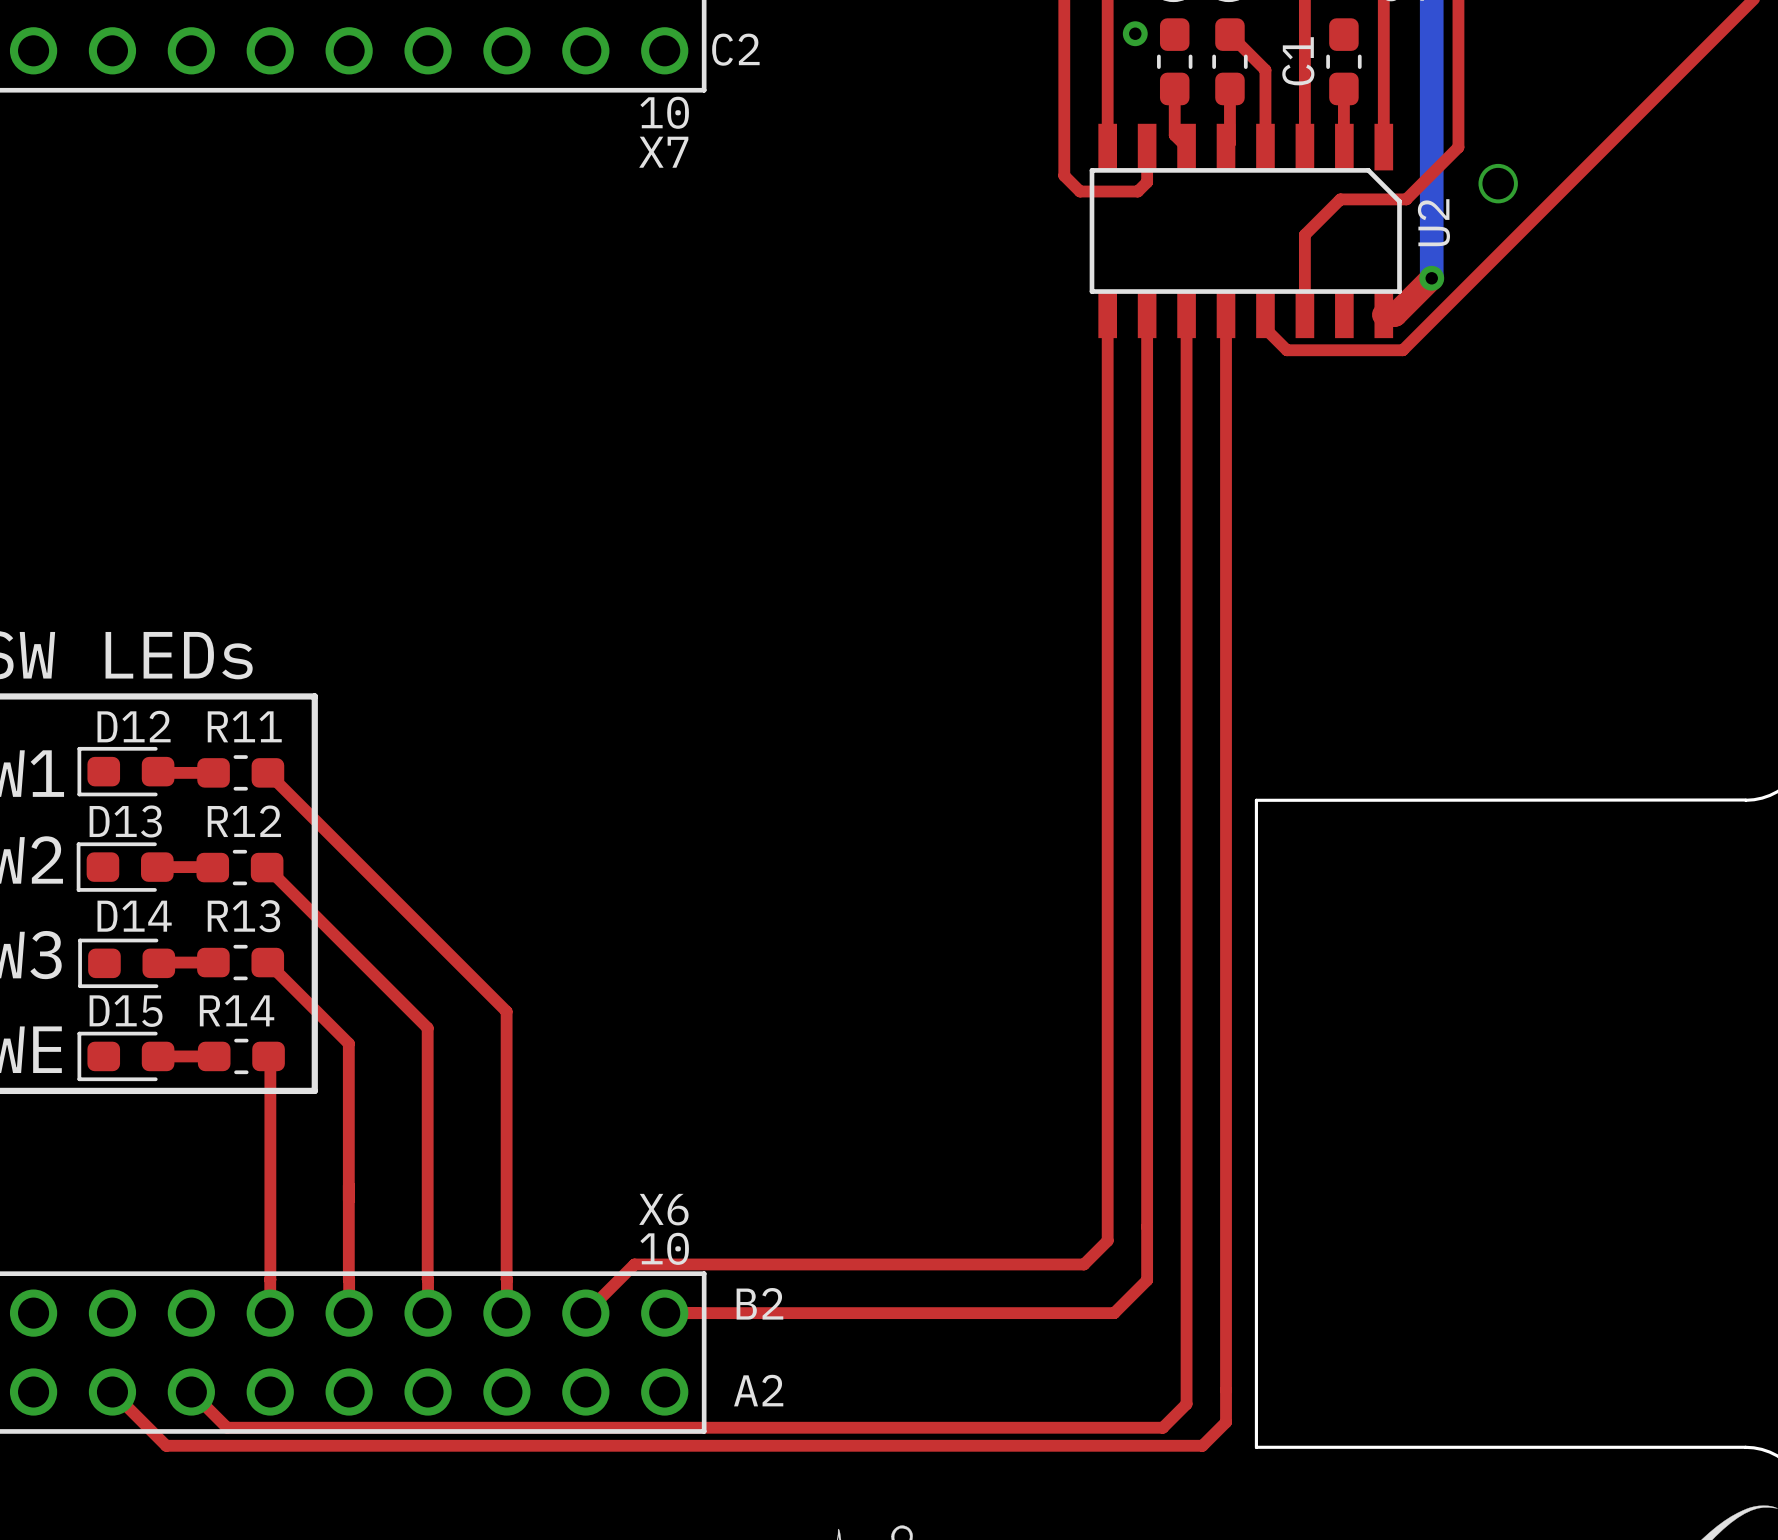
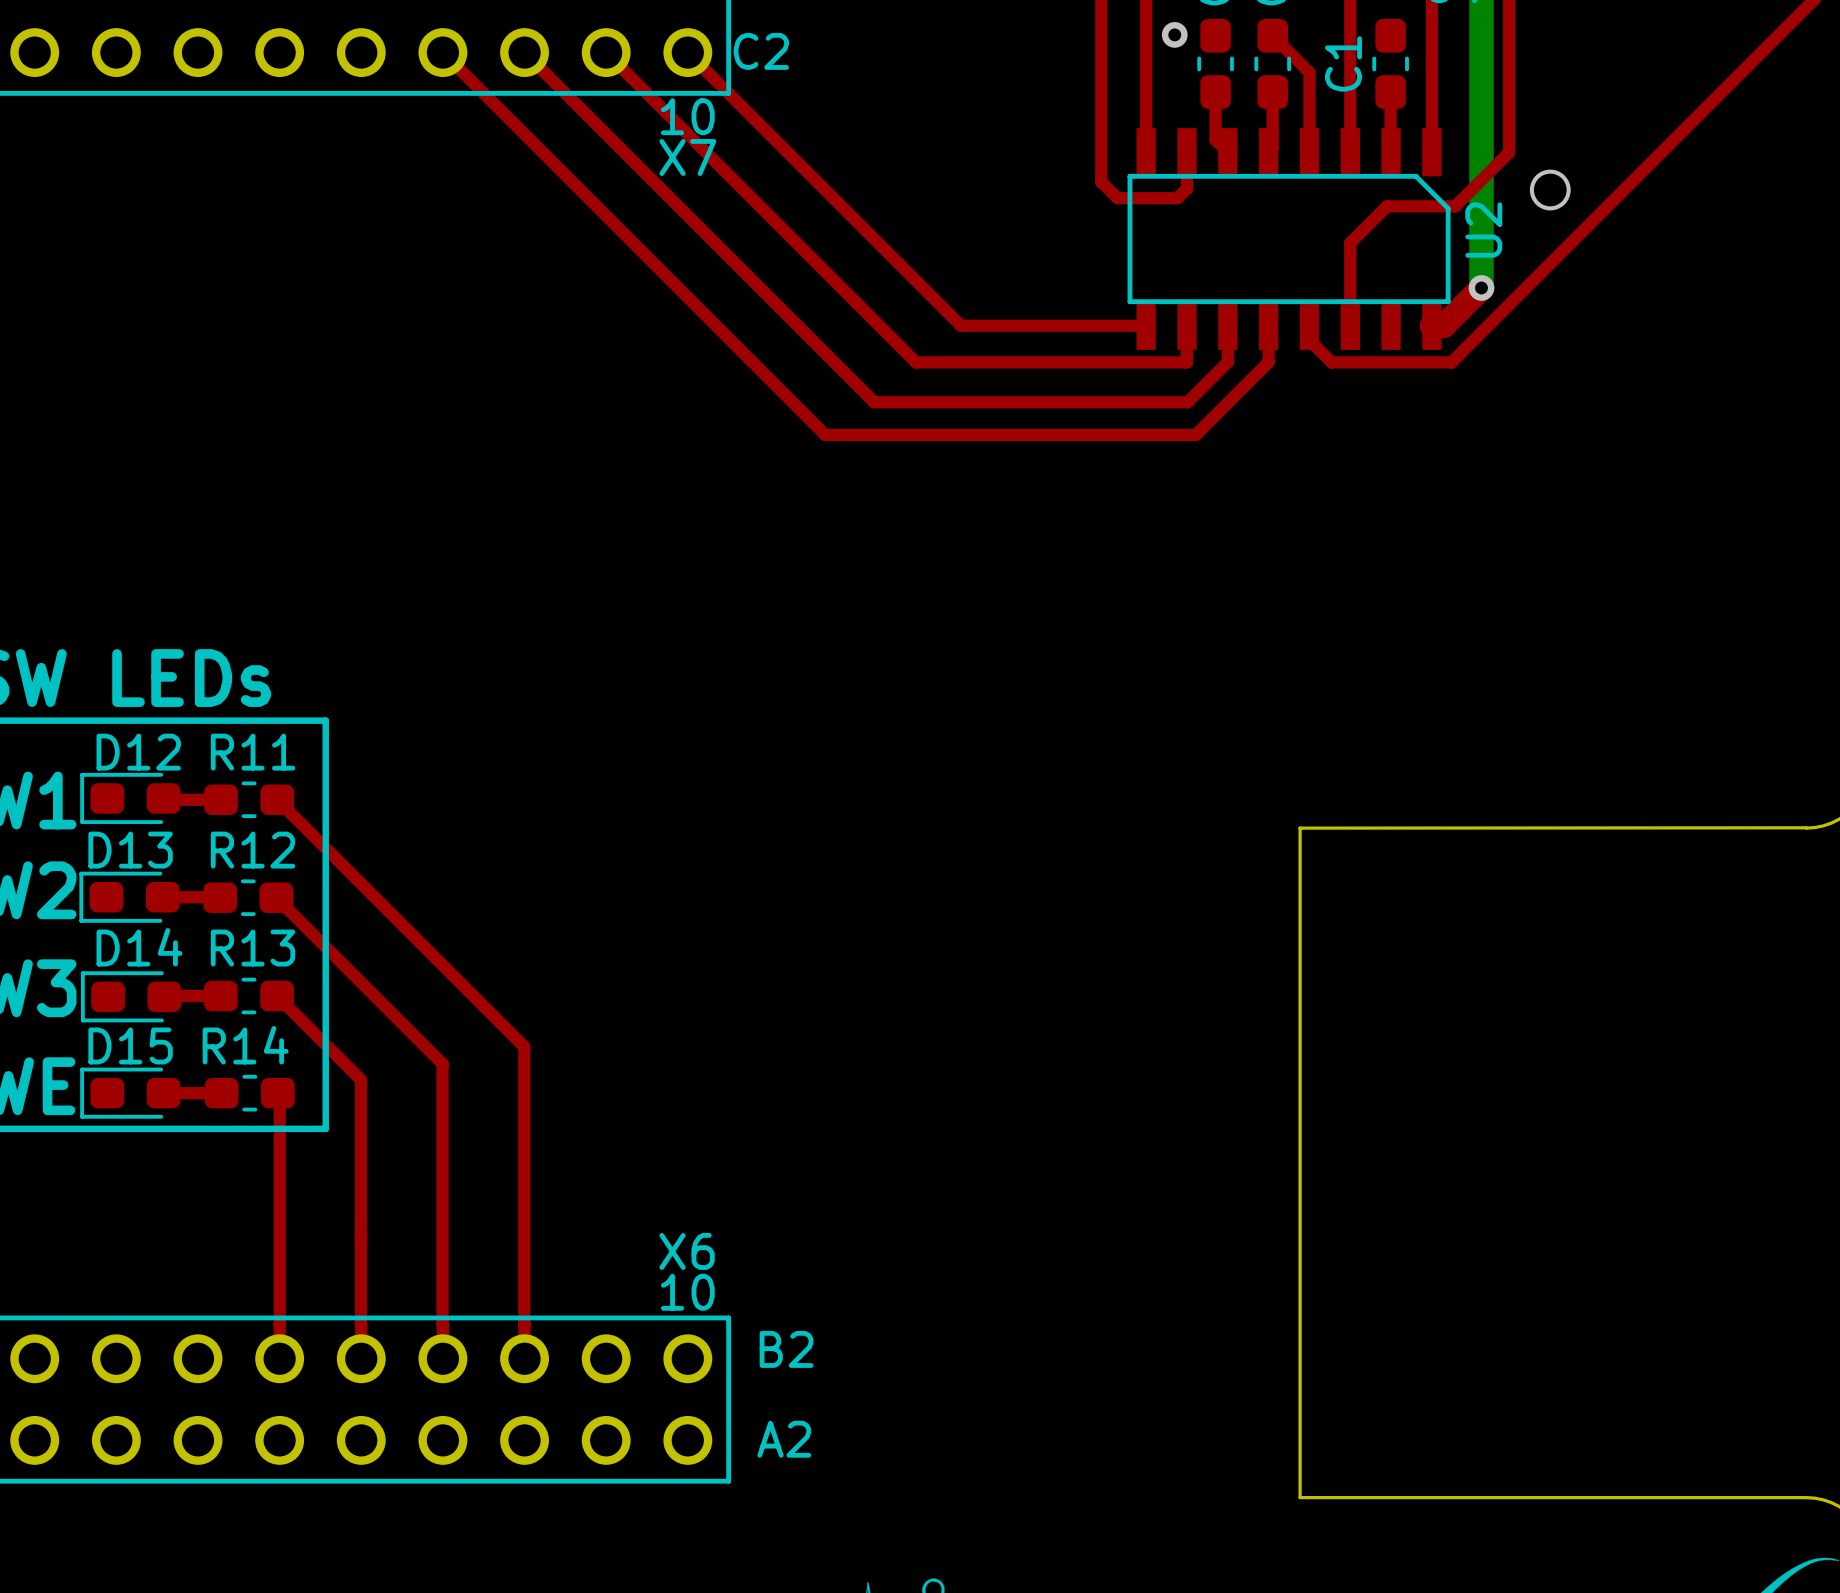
top track: (1107, 314) (1107, 1240) (1084, 1264) (634, 1264) (585, 1313) -> (1146, 325) (961, 325) (687, 52)
top track: (1147, 349) (1147, 1280) (1114, 1313) (664, 1313) -> (1186, 362) (916, 362) (606, 52)
top track: (1186, 349) (1186, 1404) (1162, 1427) (227, 1427) (191, 1392) -> (1227, 362) (1187, 402) (874, 402) (524, 52)
top track: (1226, 349) (1226, 1422) (1202, 1445) (166, 1445) (112, 1392) -> (1268, 362) (1195, 434) (825, 434) (442, 52)

